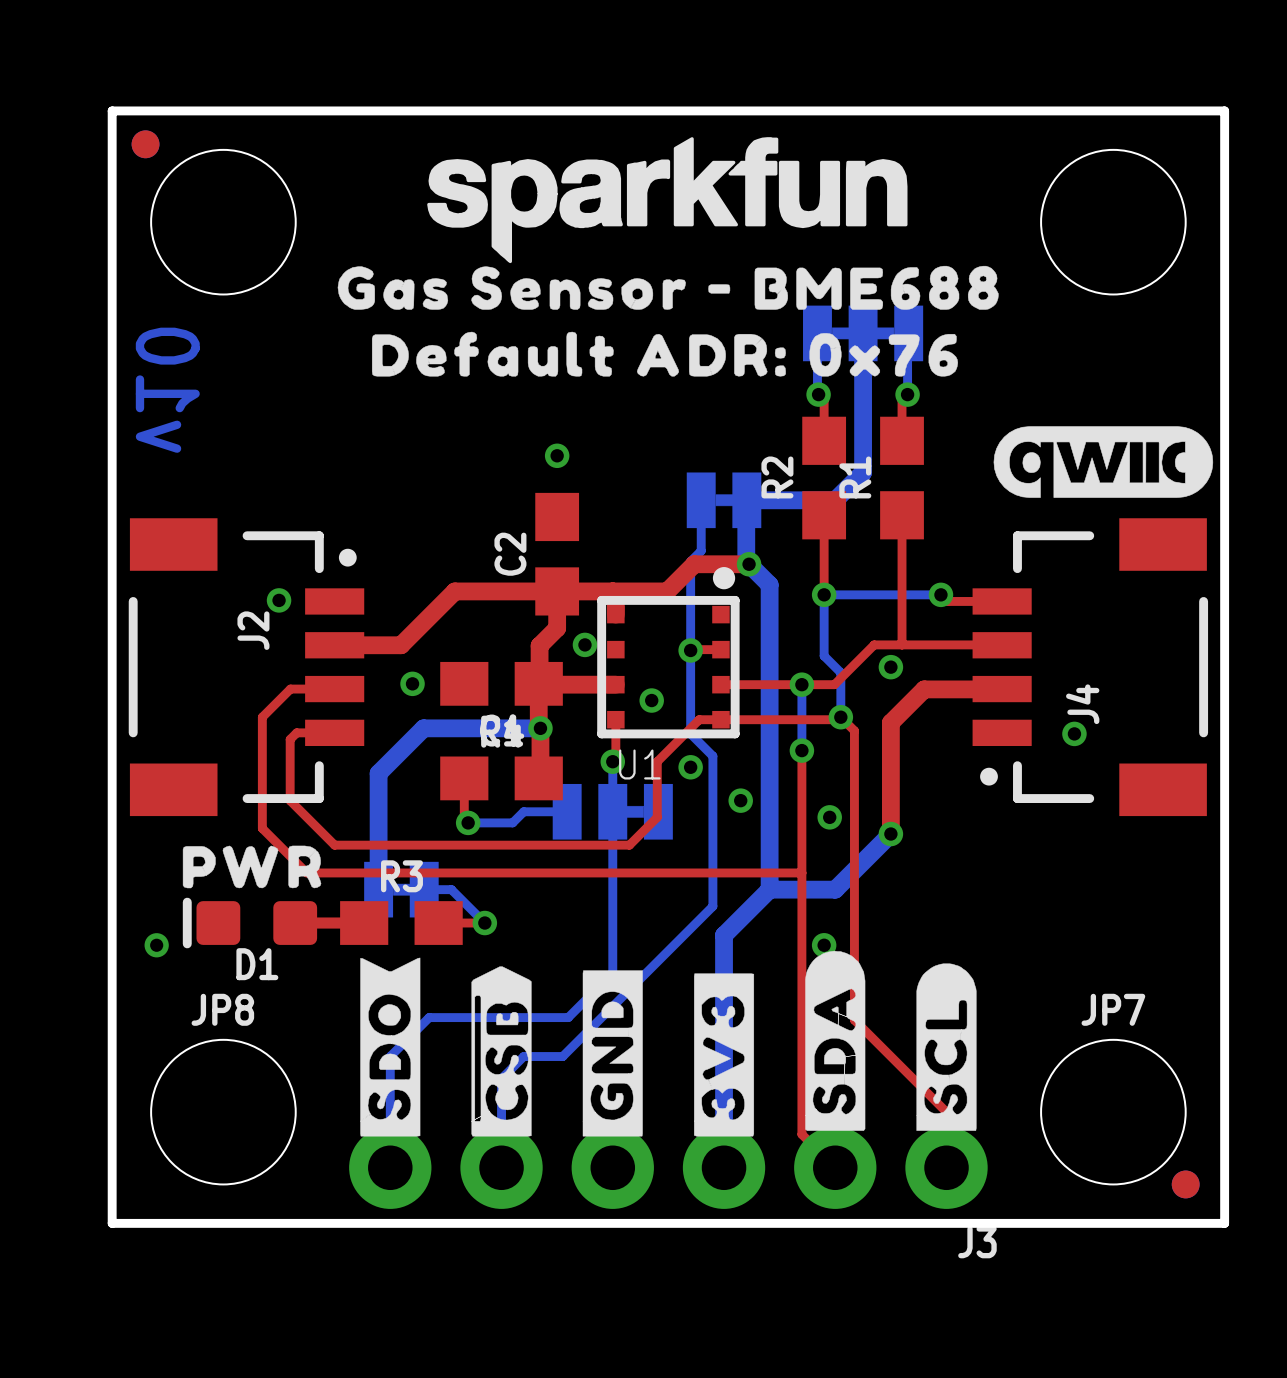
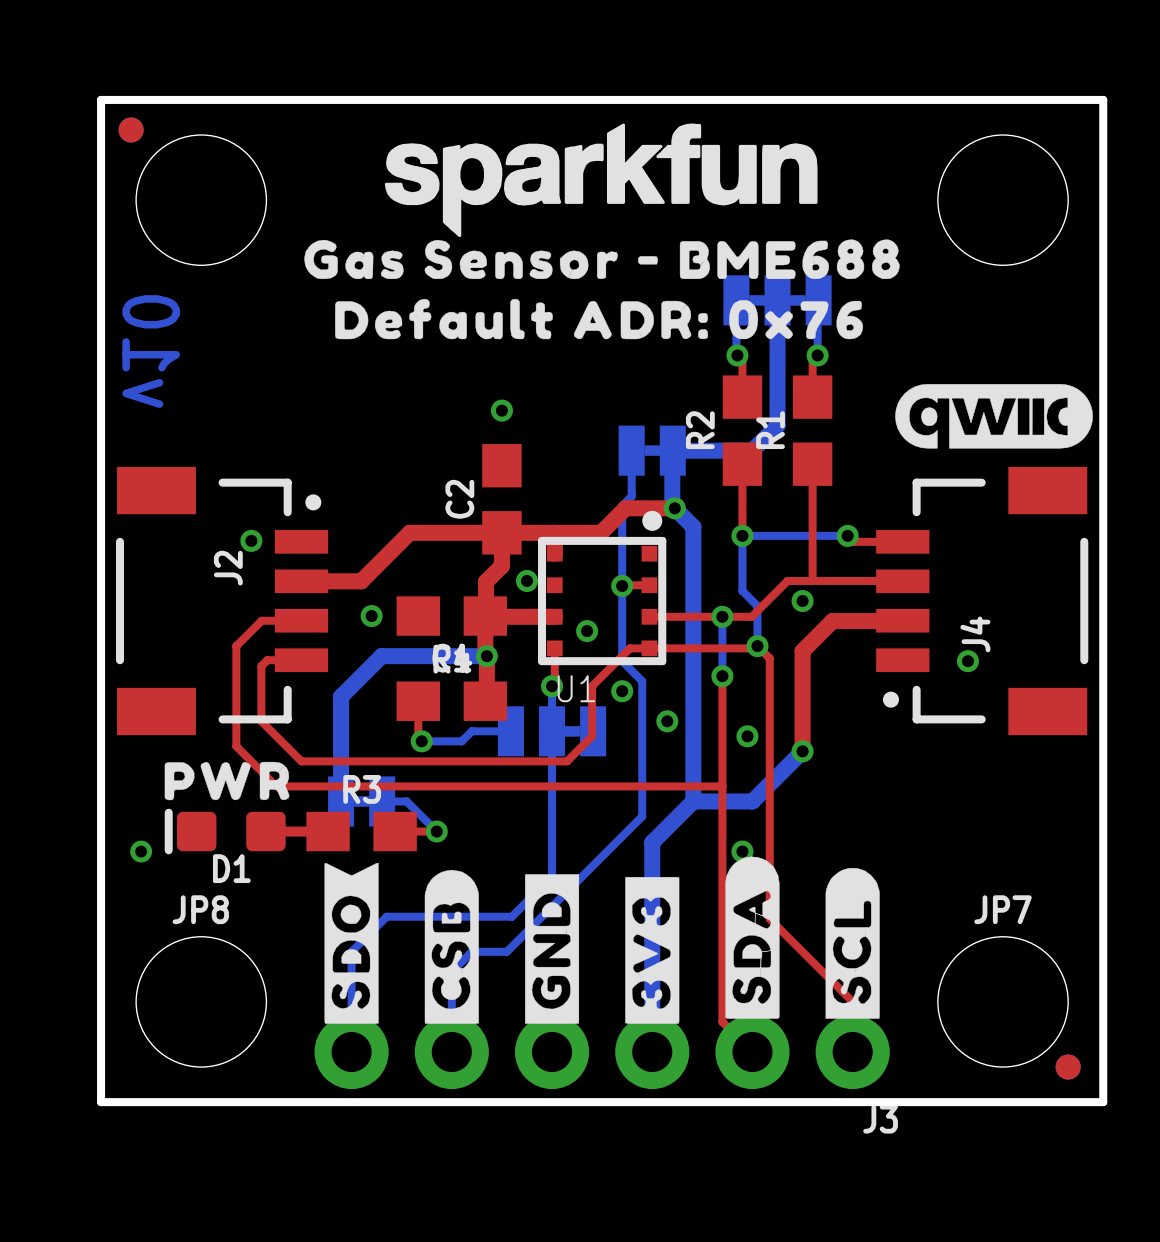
drawing shape: [471, 966, 532, 1137] -> [424, 869, 479, 1024]

